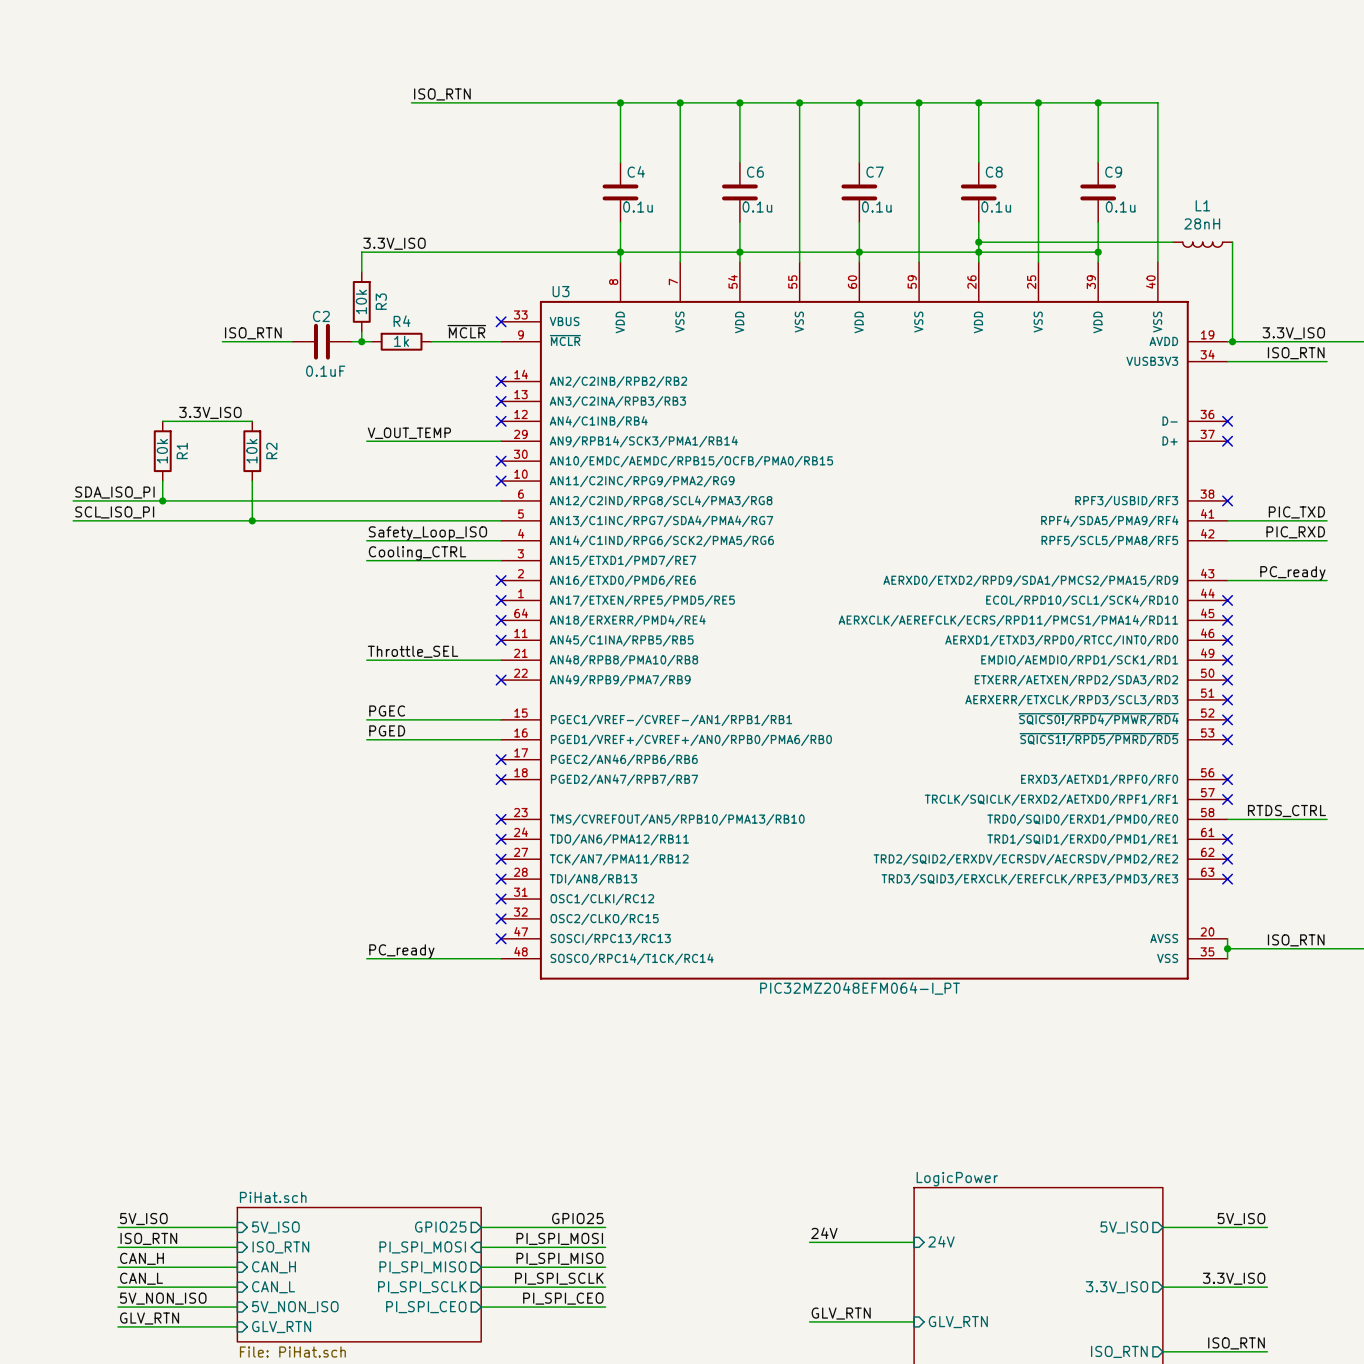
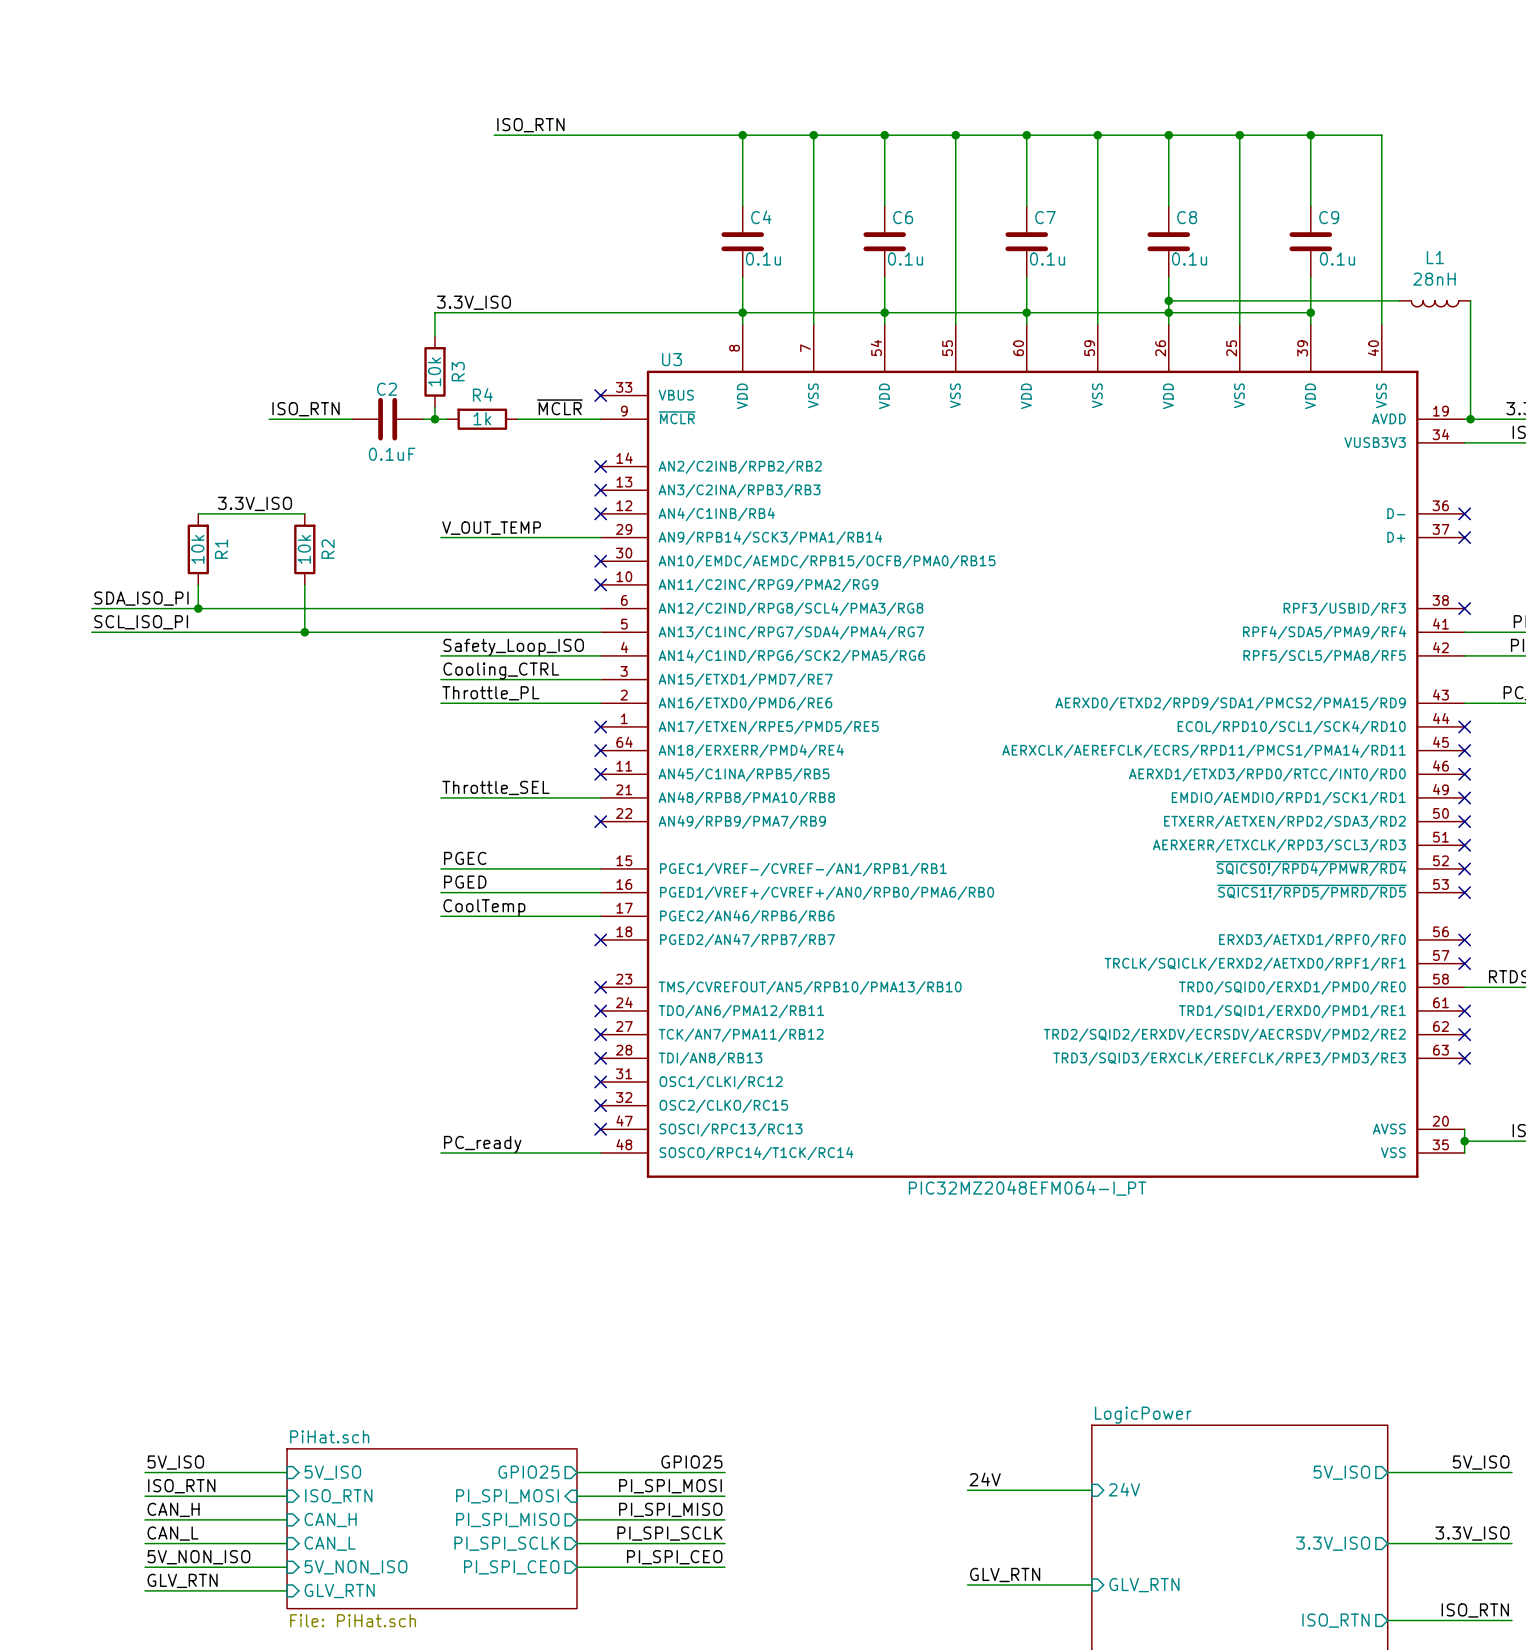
label: none -> Throttle_PL (490, 693)
wire: none -> (440, 703) (600, 703)
no-connect mark: (501, 580) -> none
label: none -> CoolTemp (484, 907)
wire: none -> (440, 916) (600, 916)
no-connect mark: (501, 759) -> none

